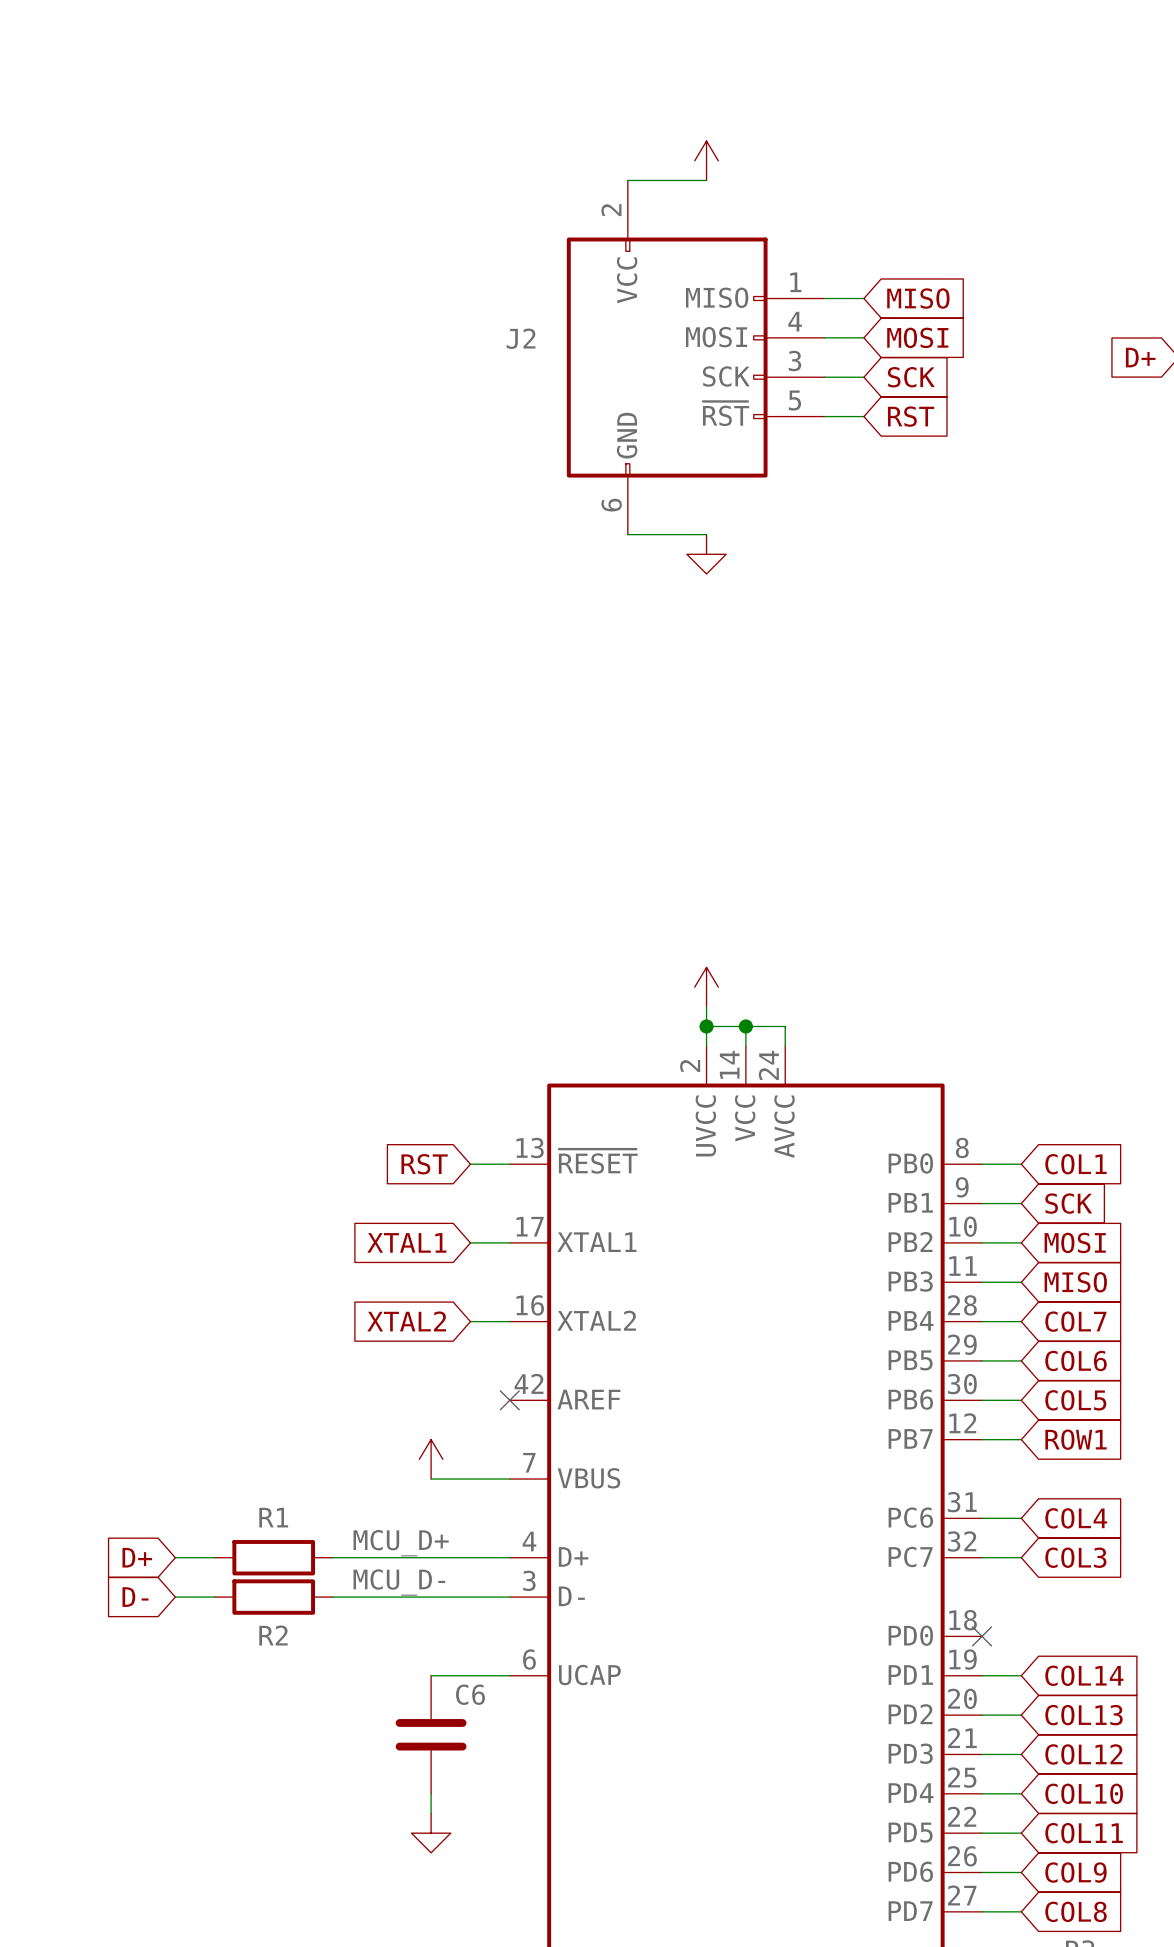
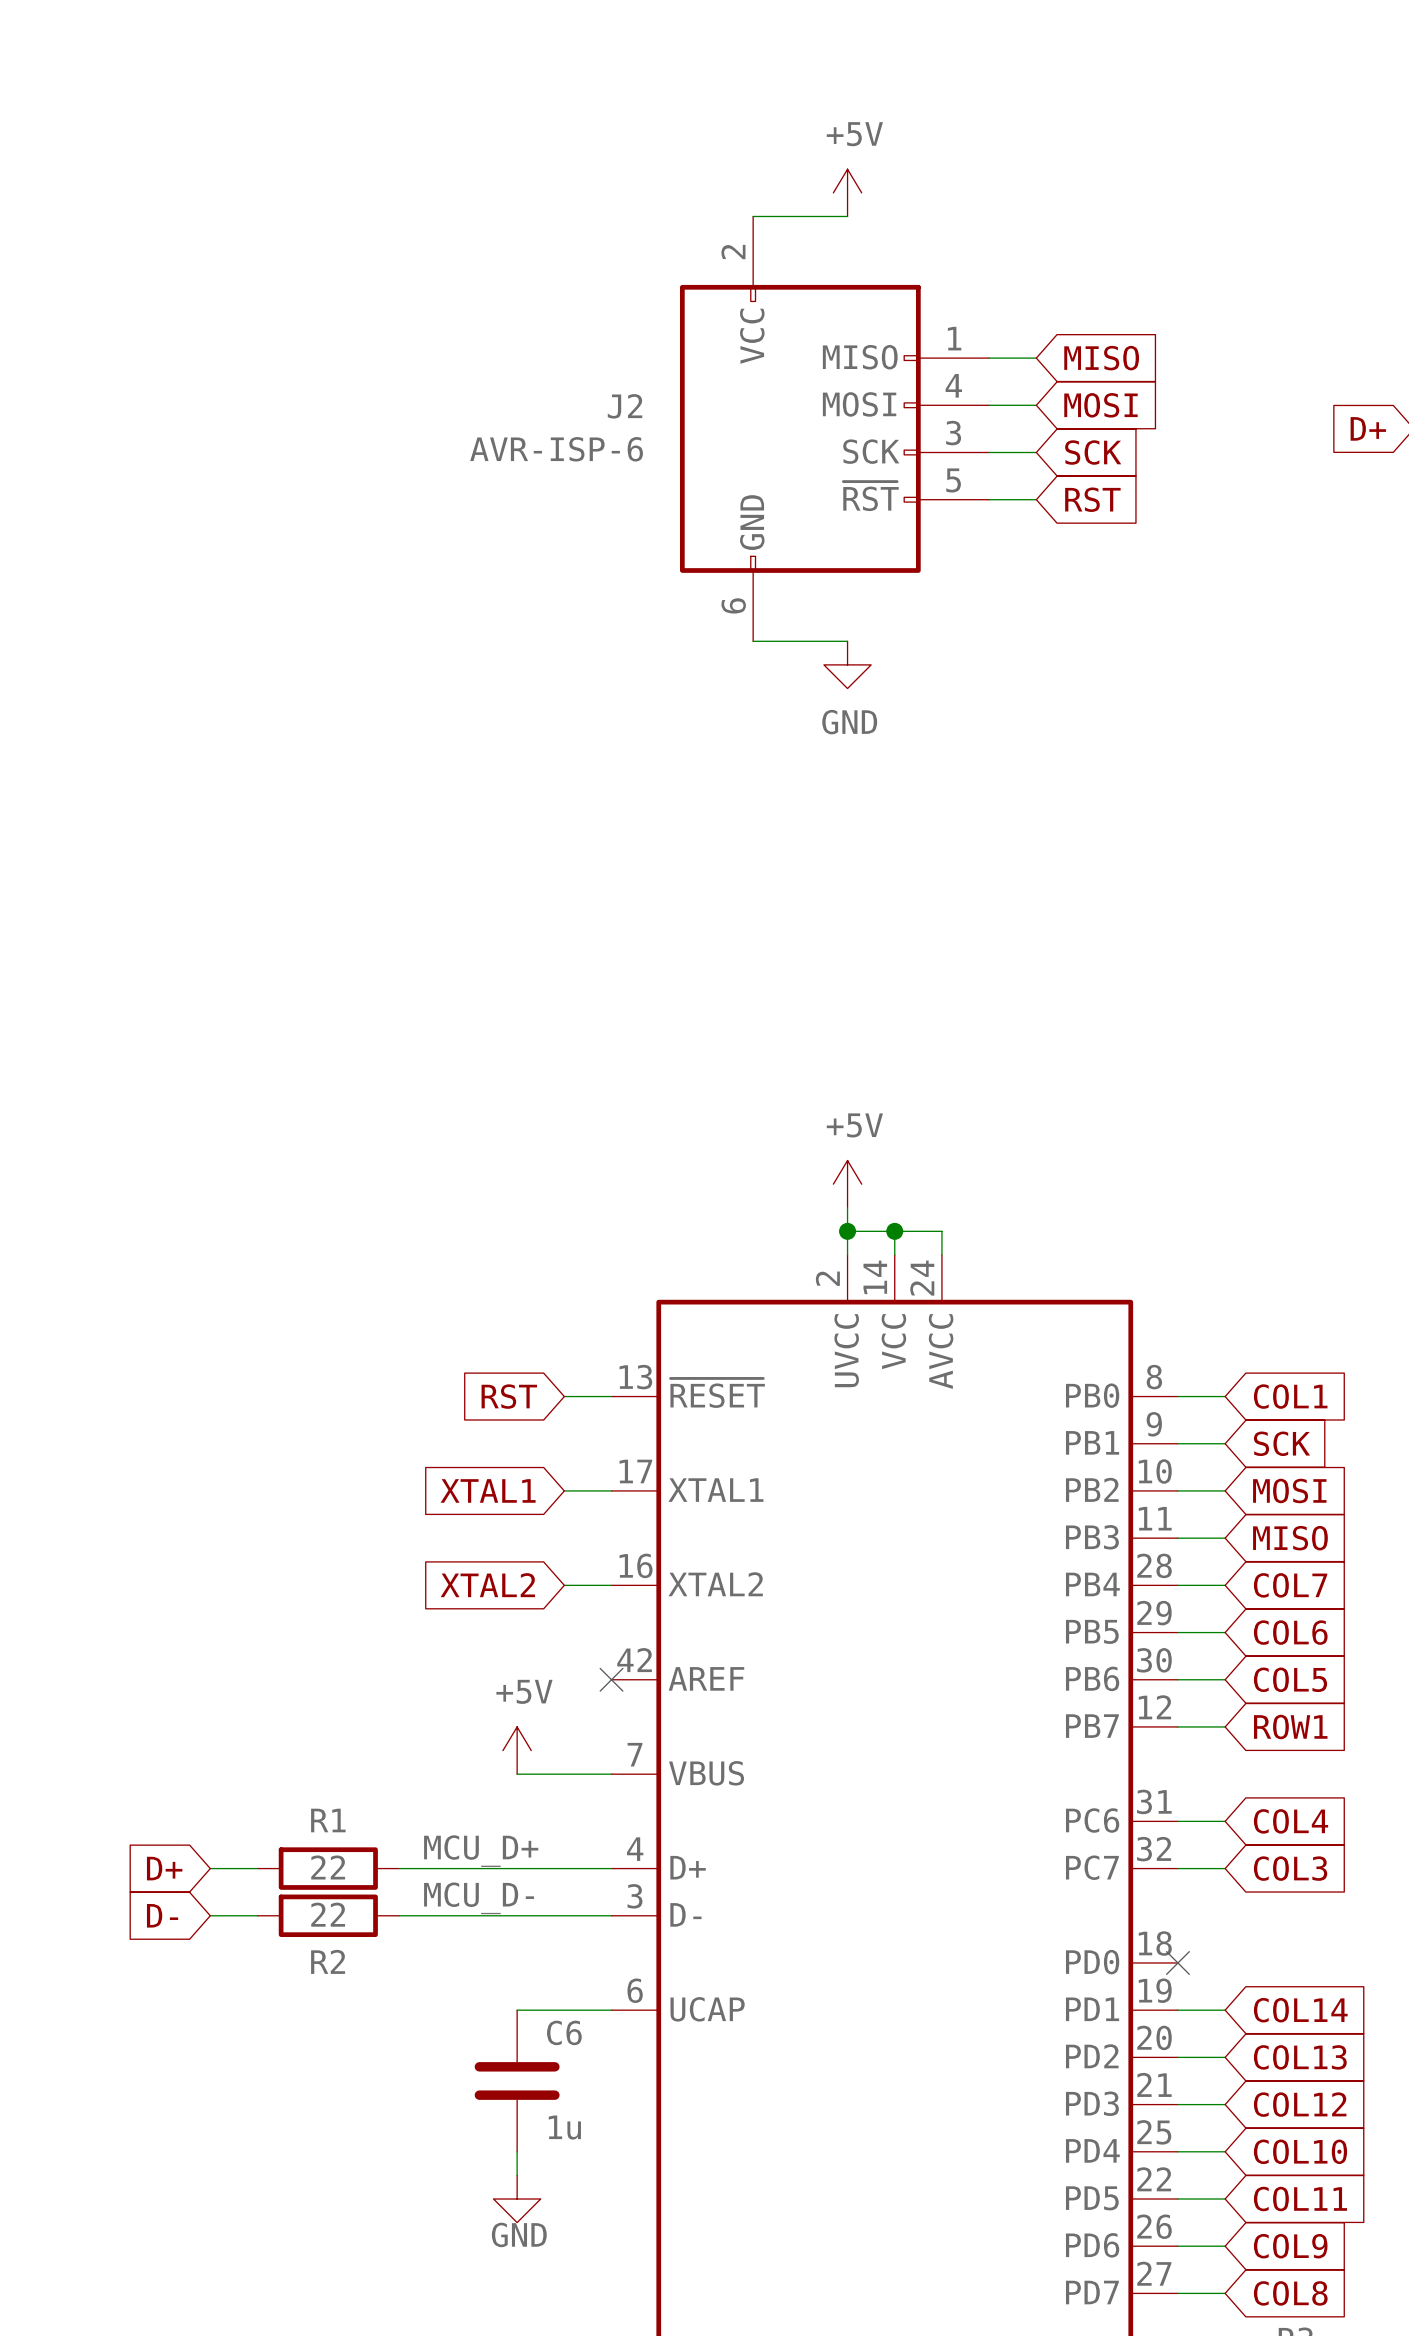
power symbol text: none -> +5V (854, 134)
J2 value: none -> AVR-ISP-6 (556, 449)
power symbol text: none -> GND (849, 722)
power symbol text: none -> +5V (854, 1125)
power symbol text: none -> +5V (524, 1691)
R1 value: none -> 22 (328, 1867)
R2 value: none -> 22 (328, 1914)
C6 value: none -> 1u (564, 2127)
power symbol text: none -> GND (519, 2234)

